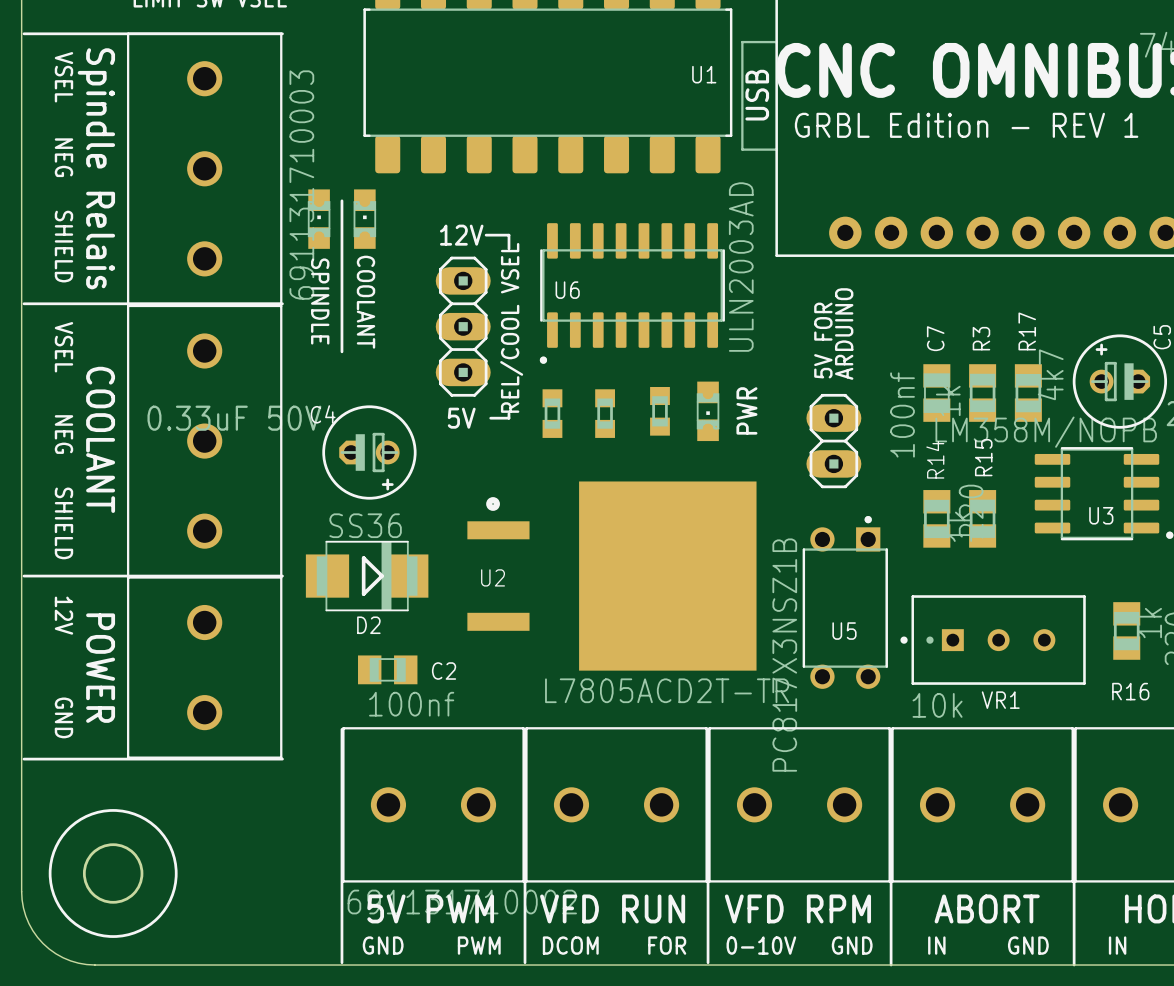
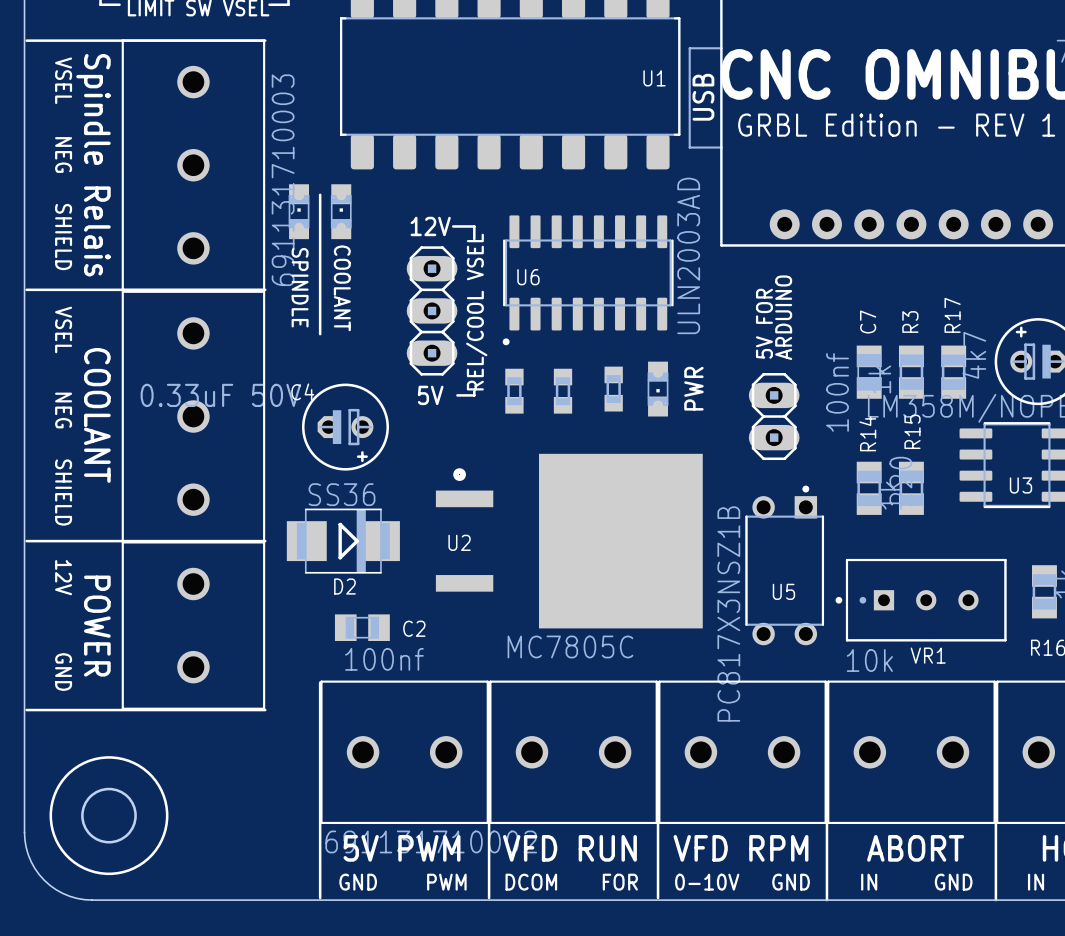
U2 value: L7805ACD2T-TR (667, 690) -> MC7805C (570, 646)

